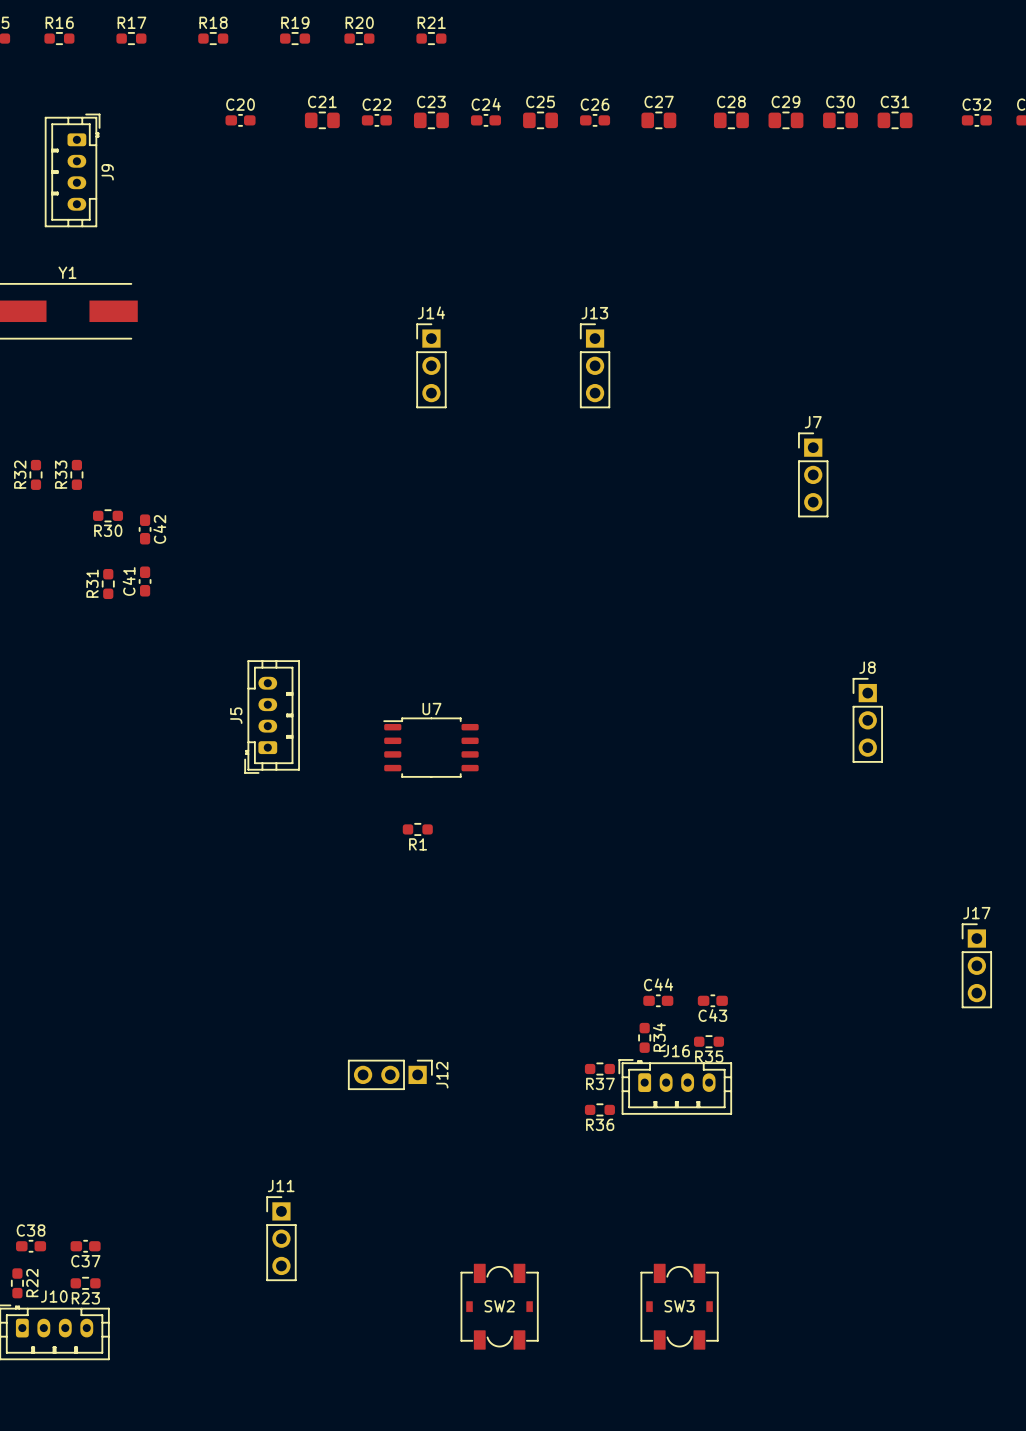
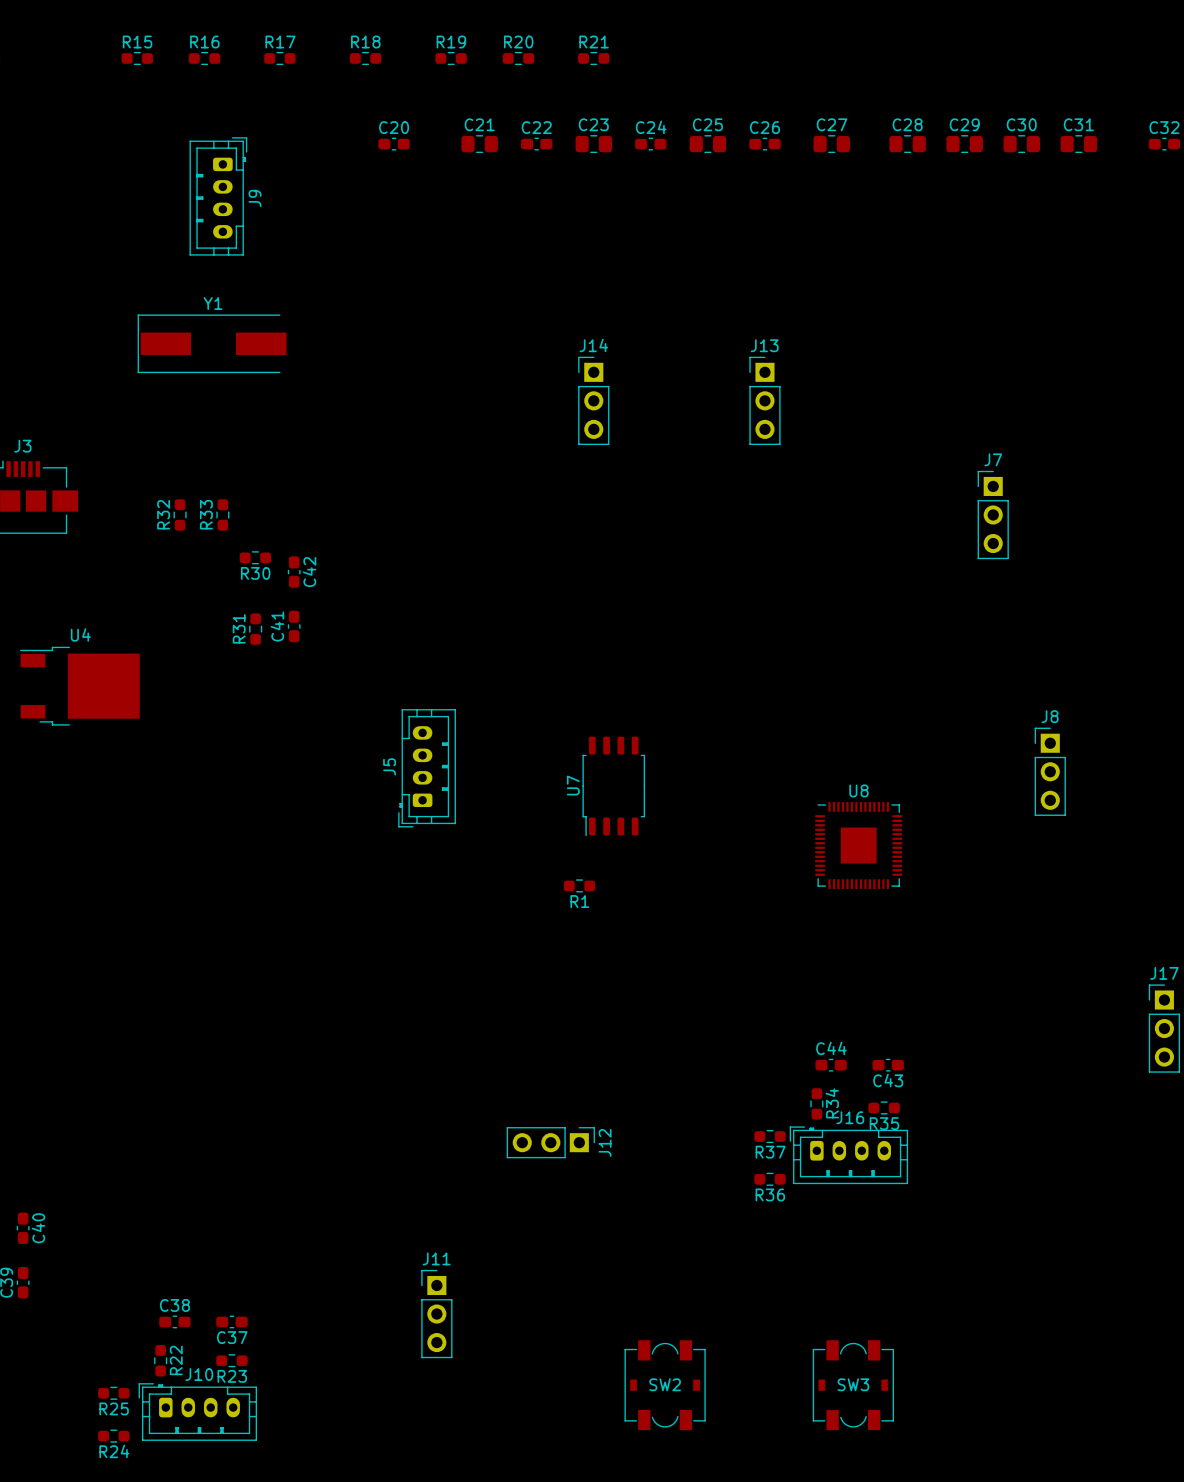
U7 rotation: 0° (431, 747) -> 90° counterclockwise (613, 786)
U8: none -> (858, 845)

